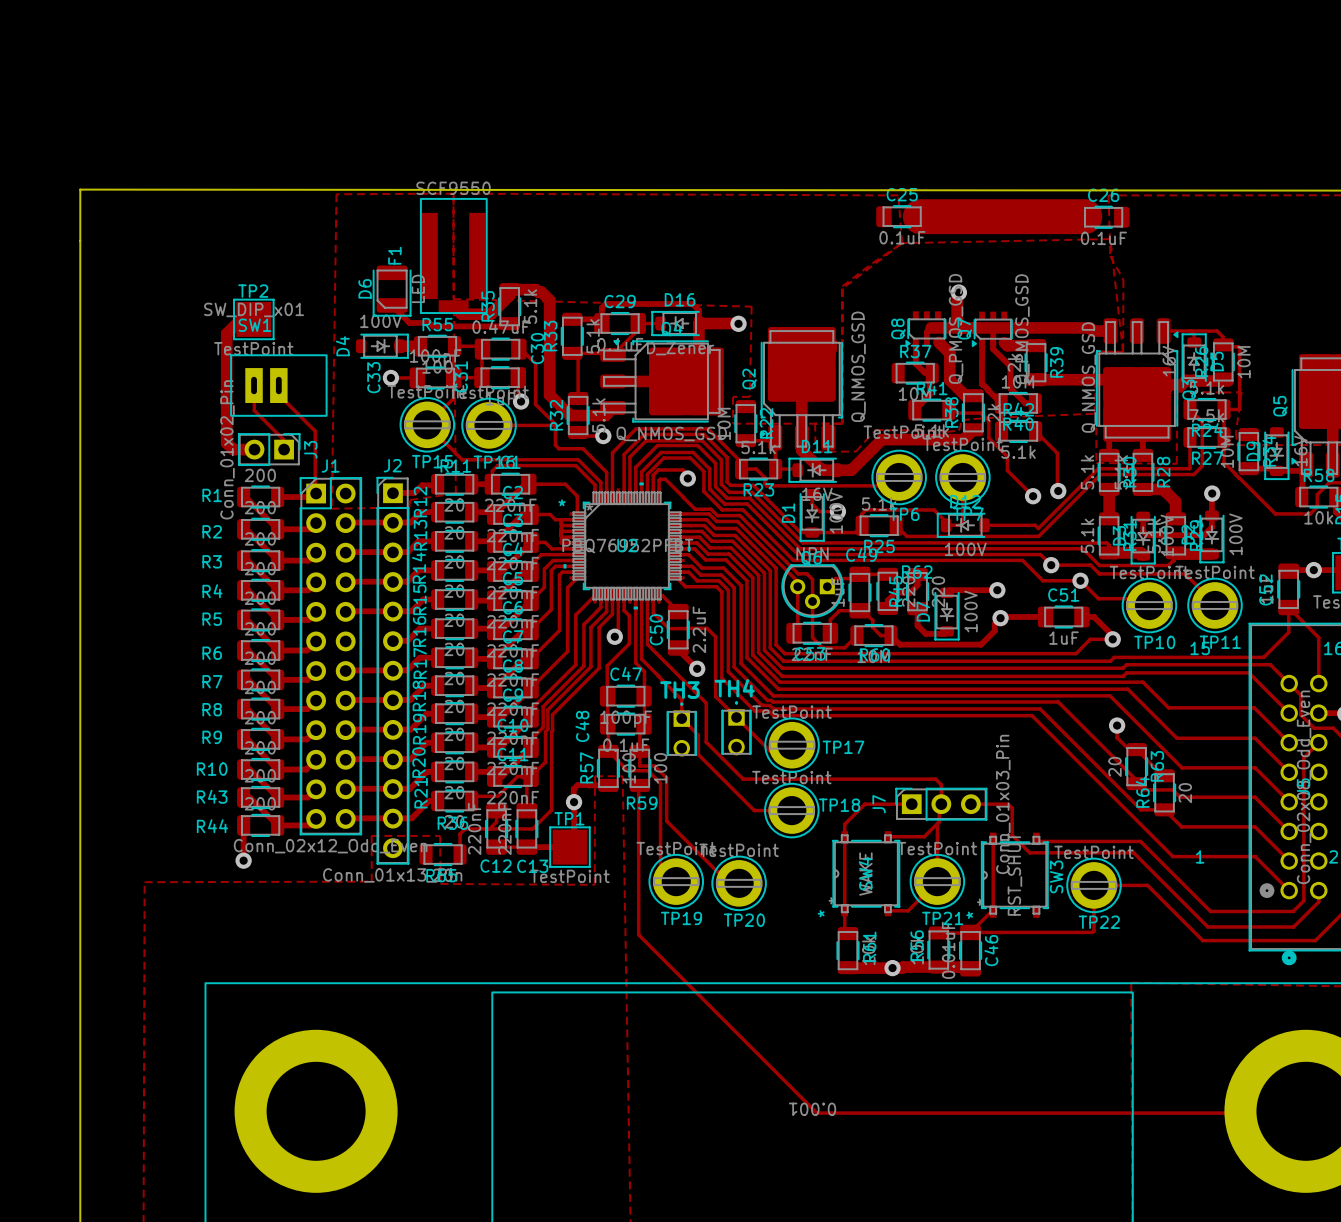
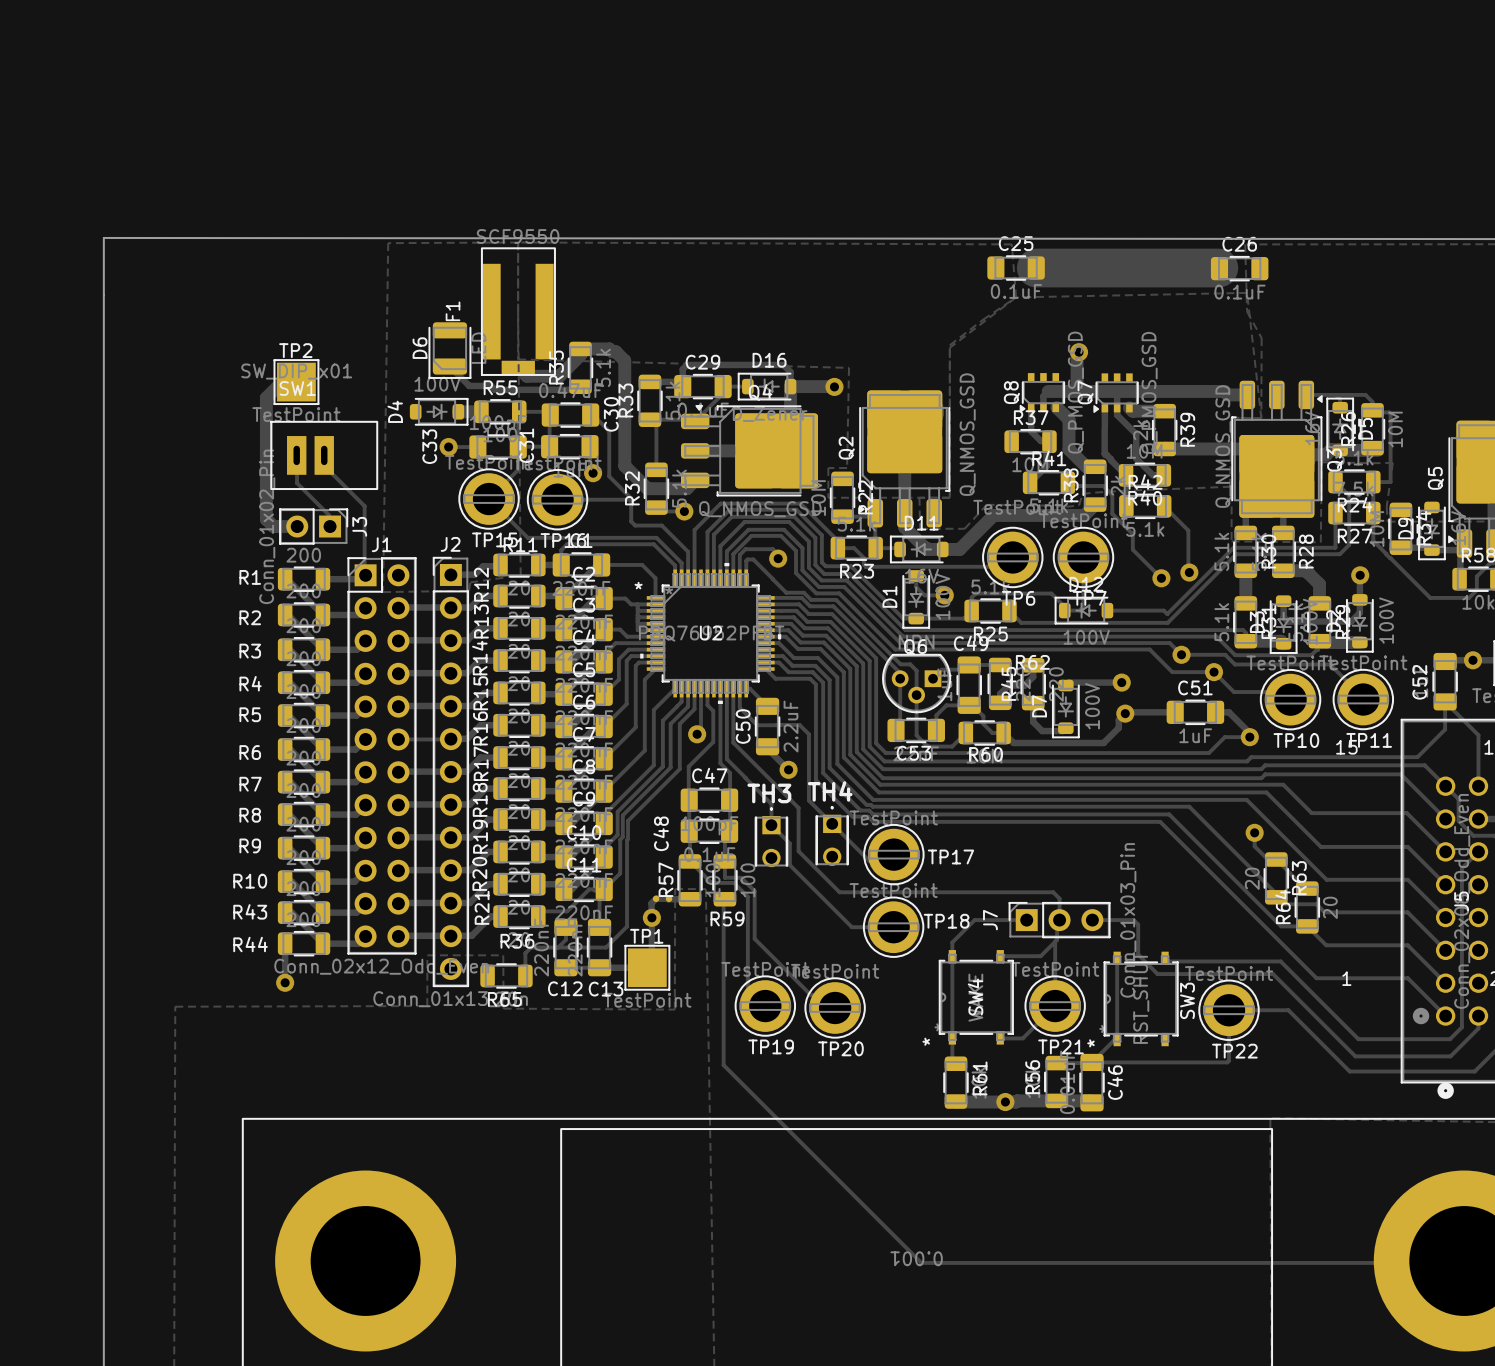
track: none -> (450, 739) (398, 739)

